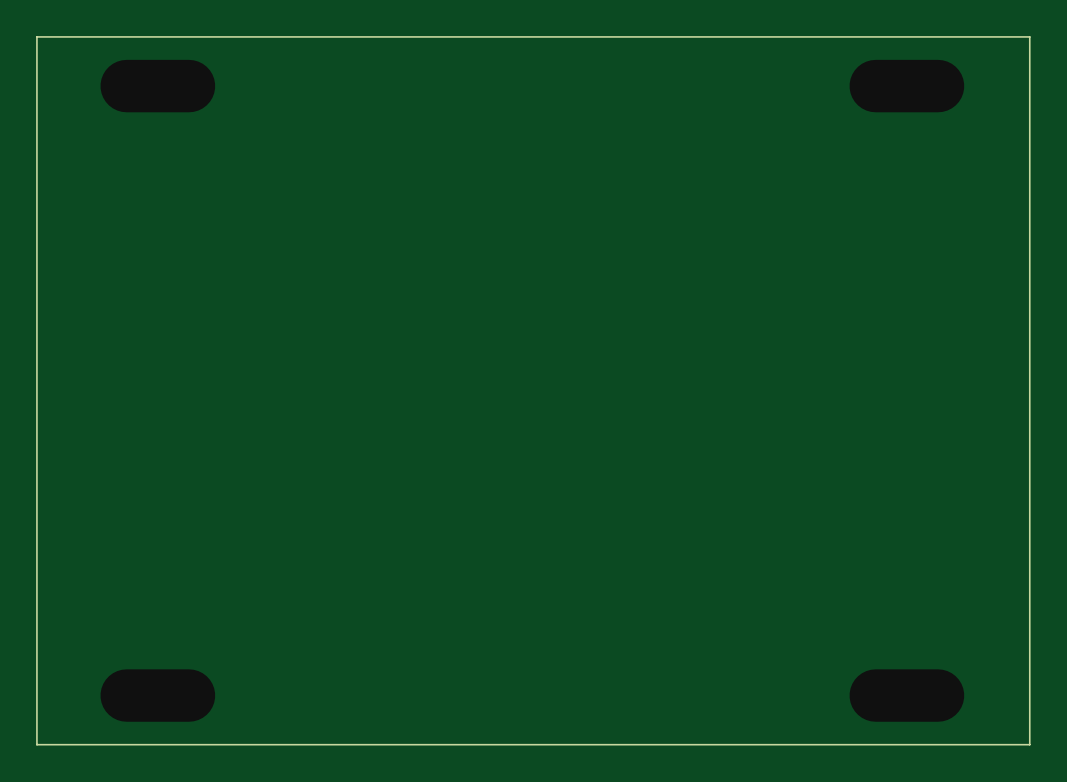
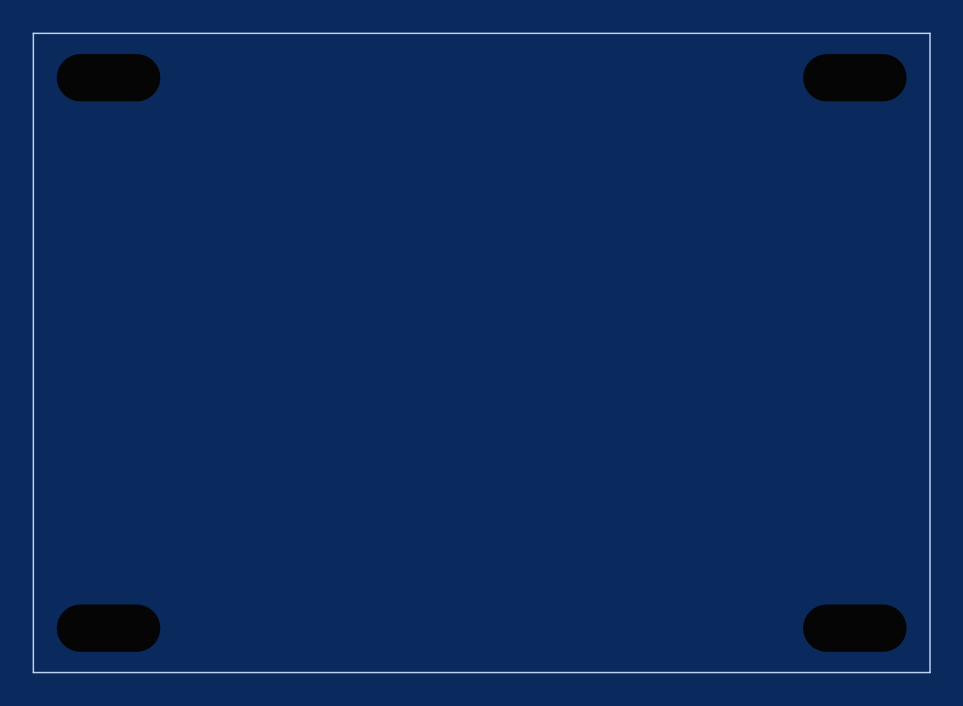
part position: (157, 86) -> (108, 77)
part position: (906, 86) -> (854, 77)
part position: (157, 695) -> (108, 628)
part position: (906, 695) -> (854, 628)

